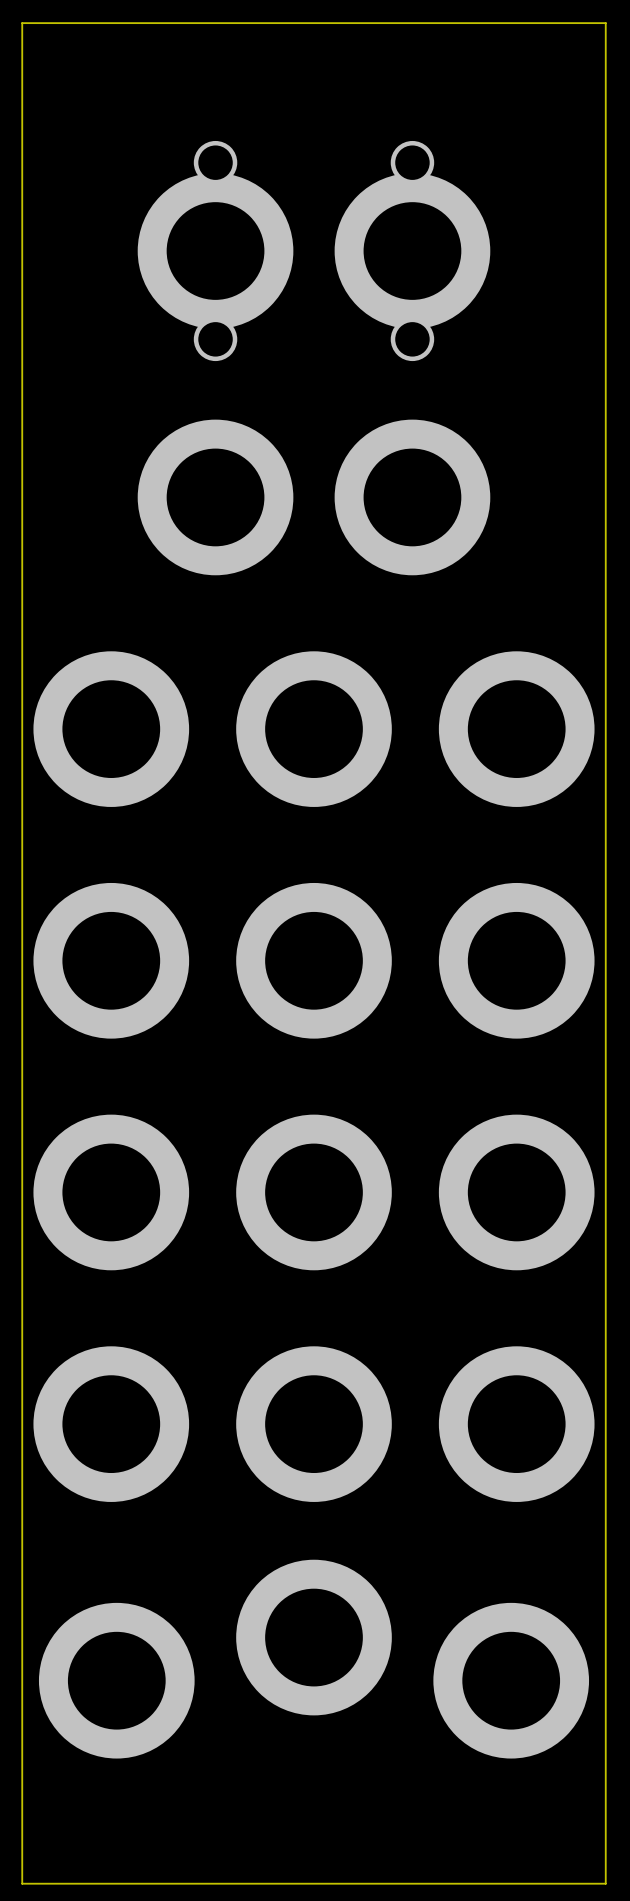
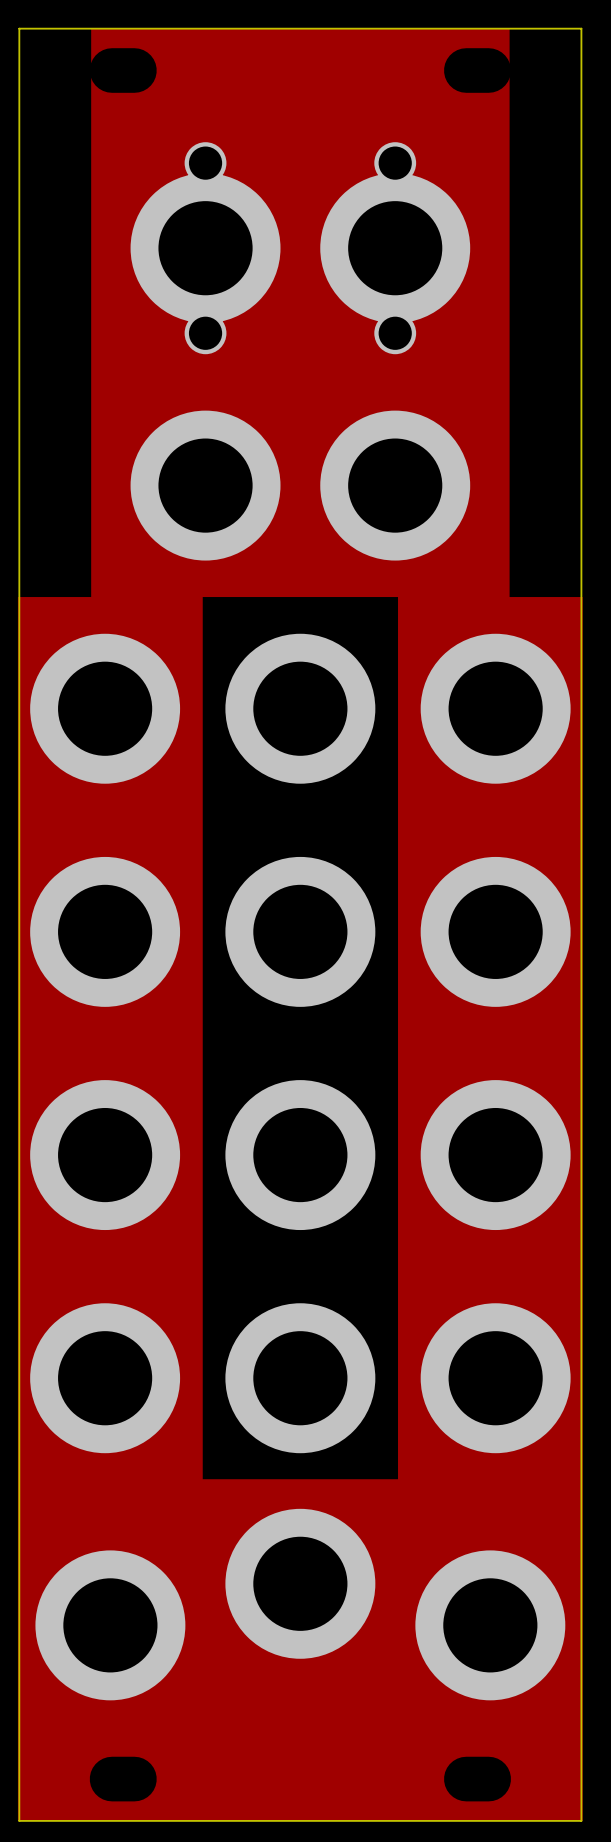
drawing: none -> [17, 28, 583, 1821]

